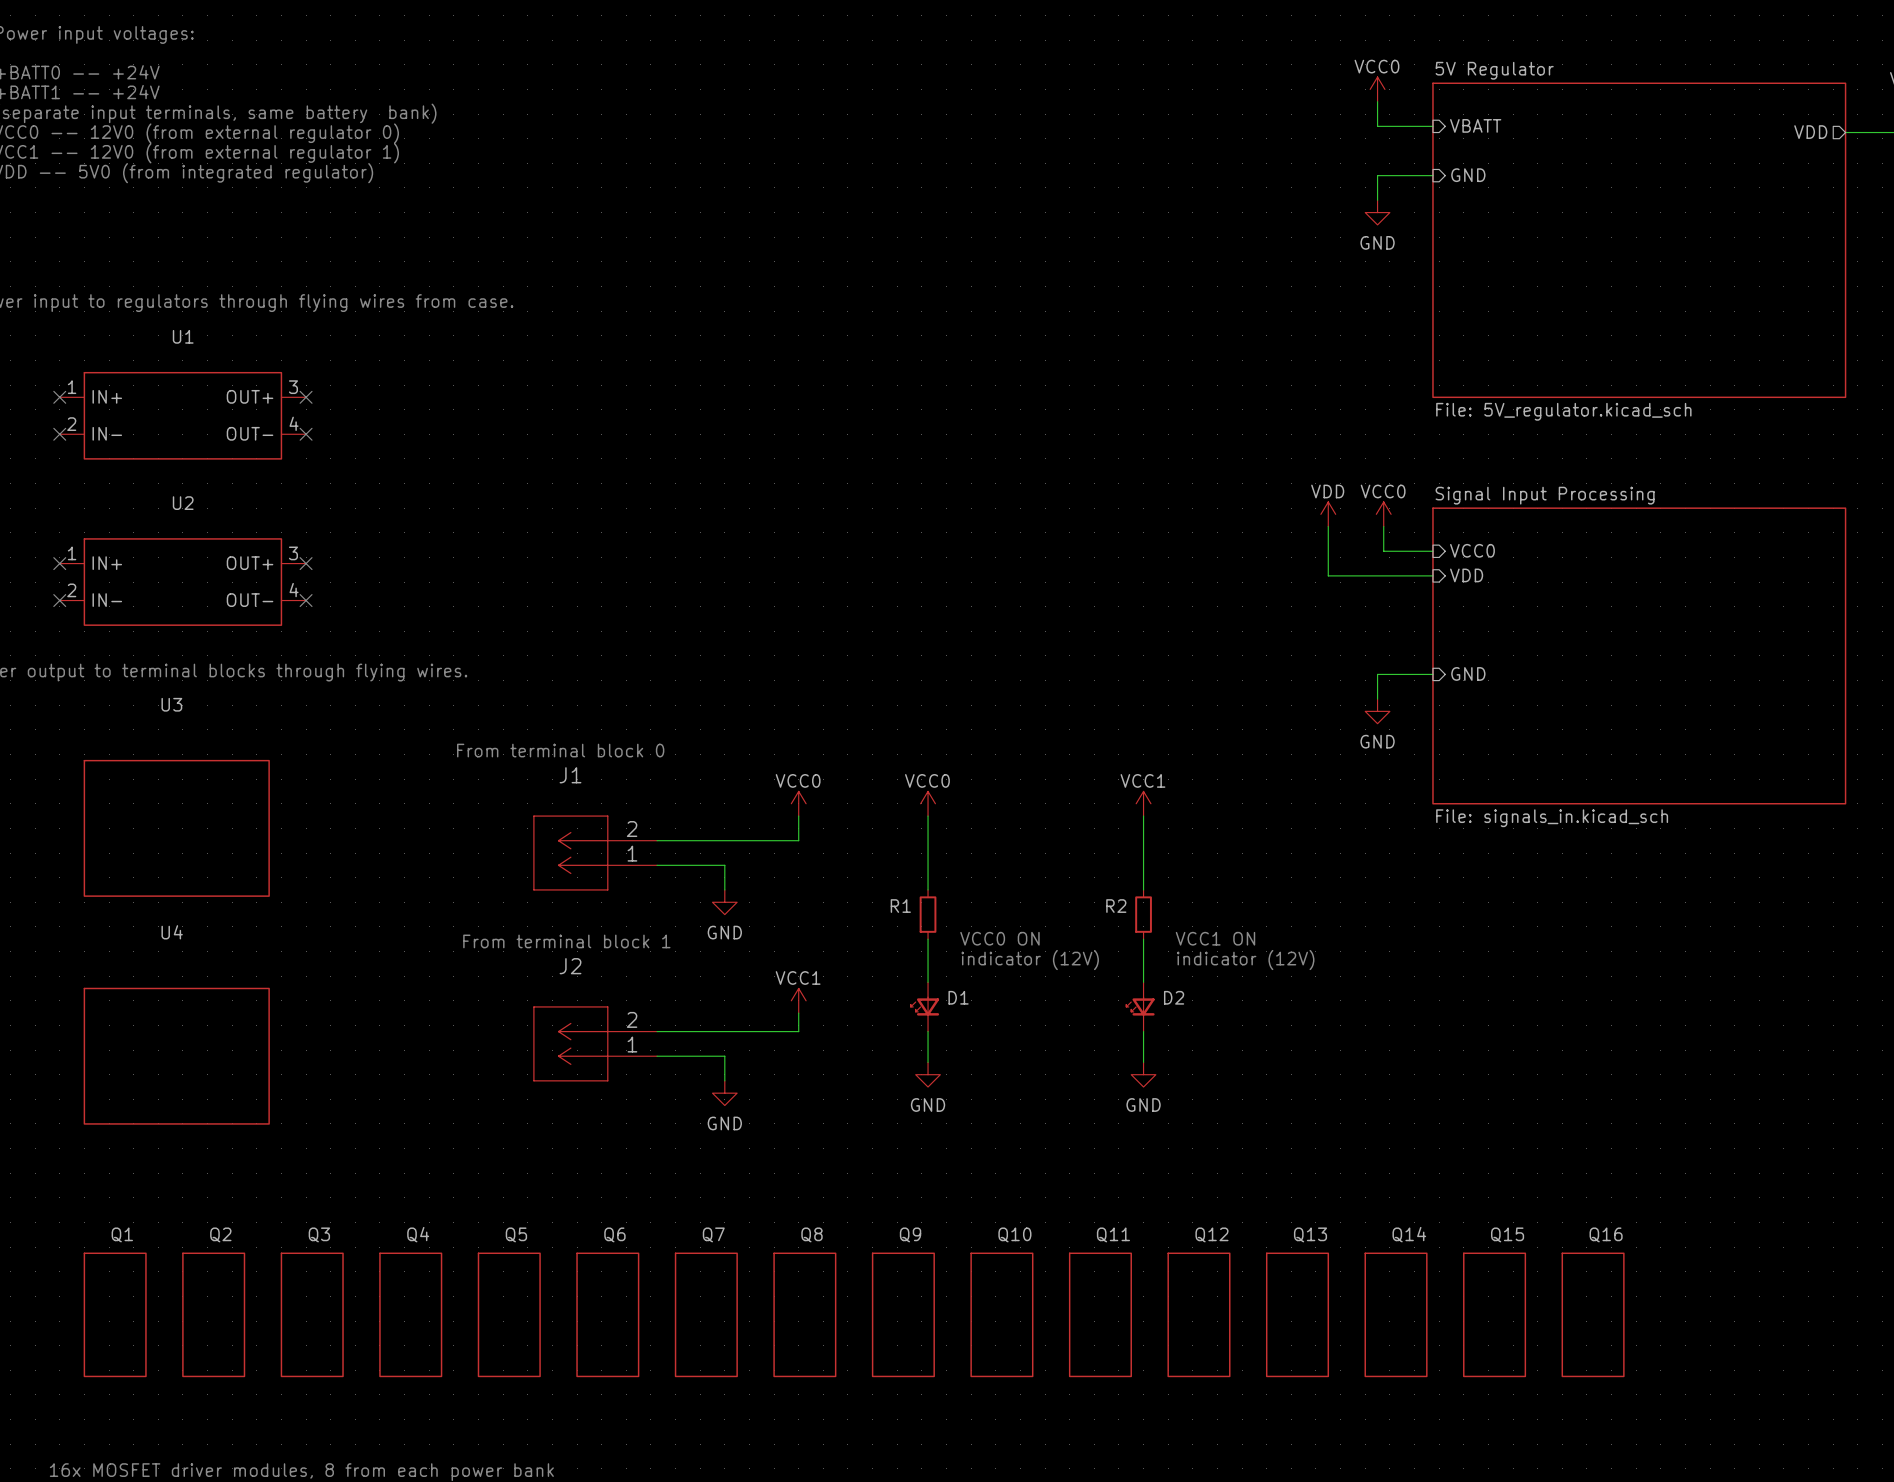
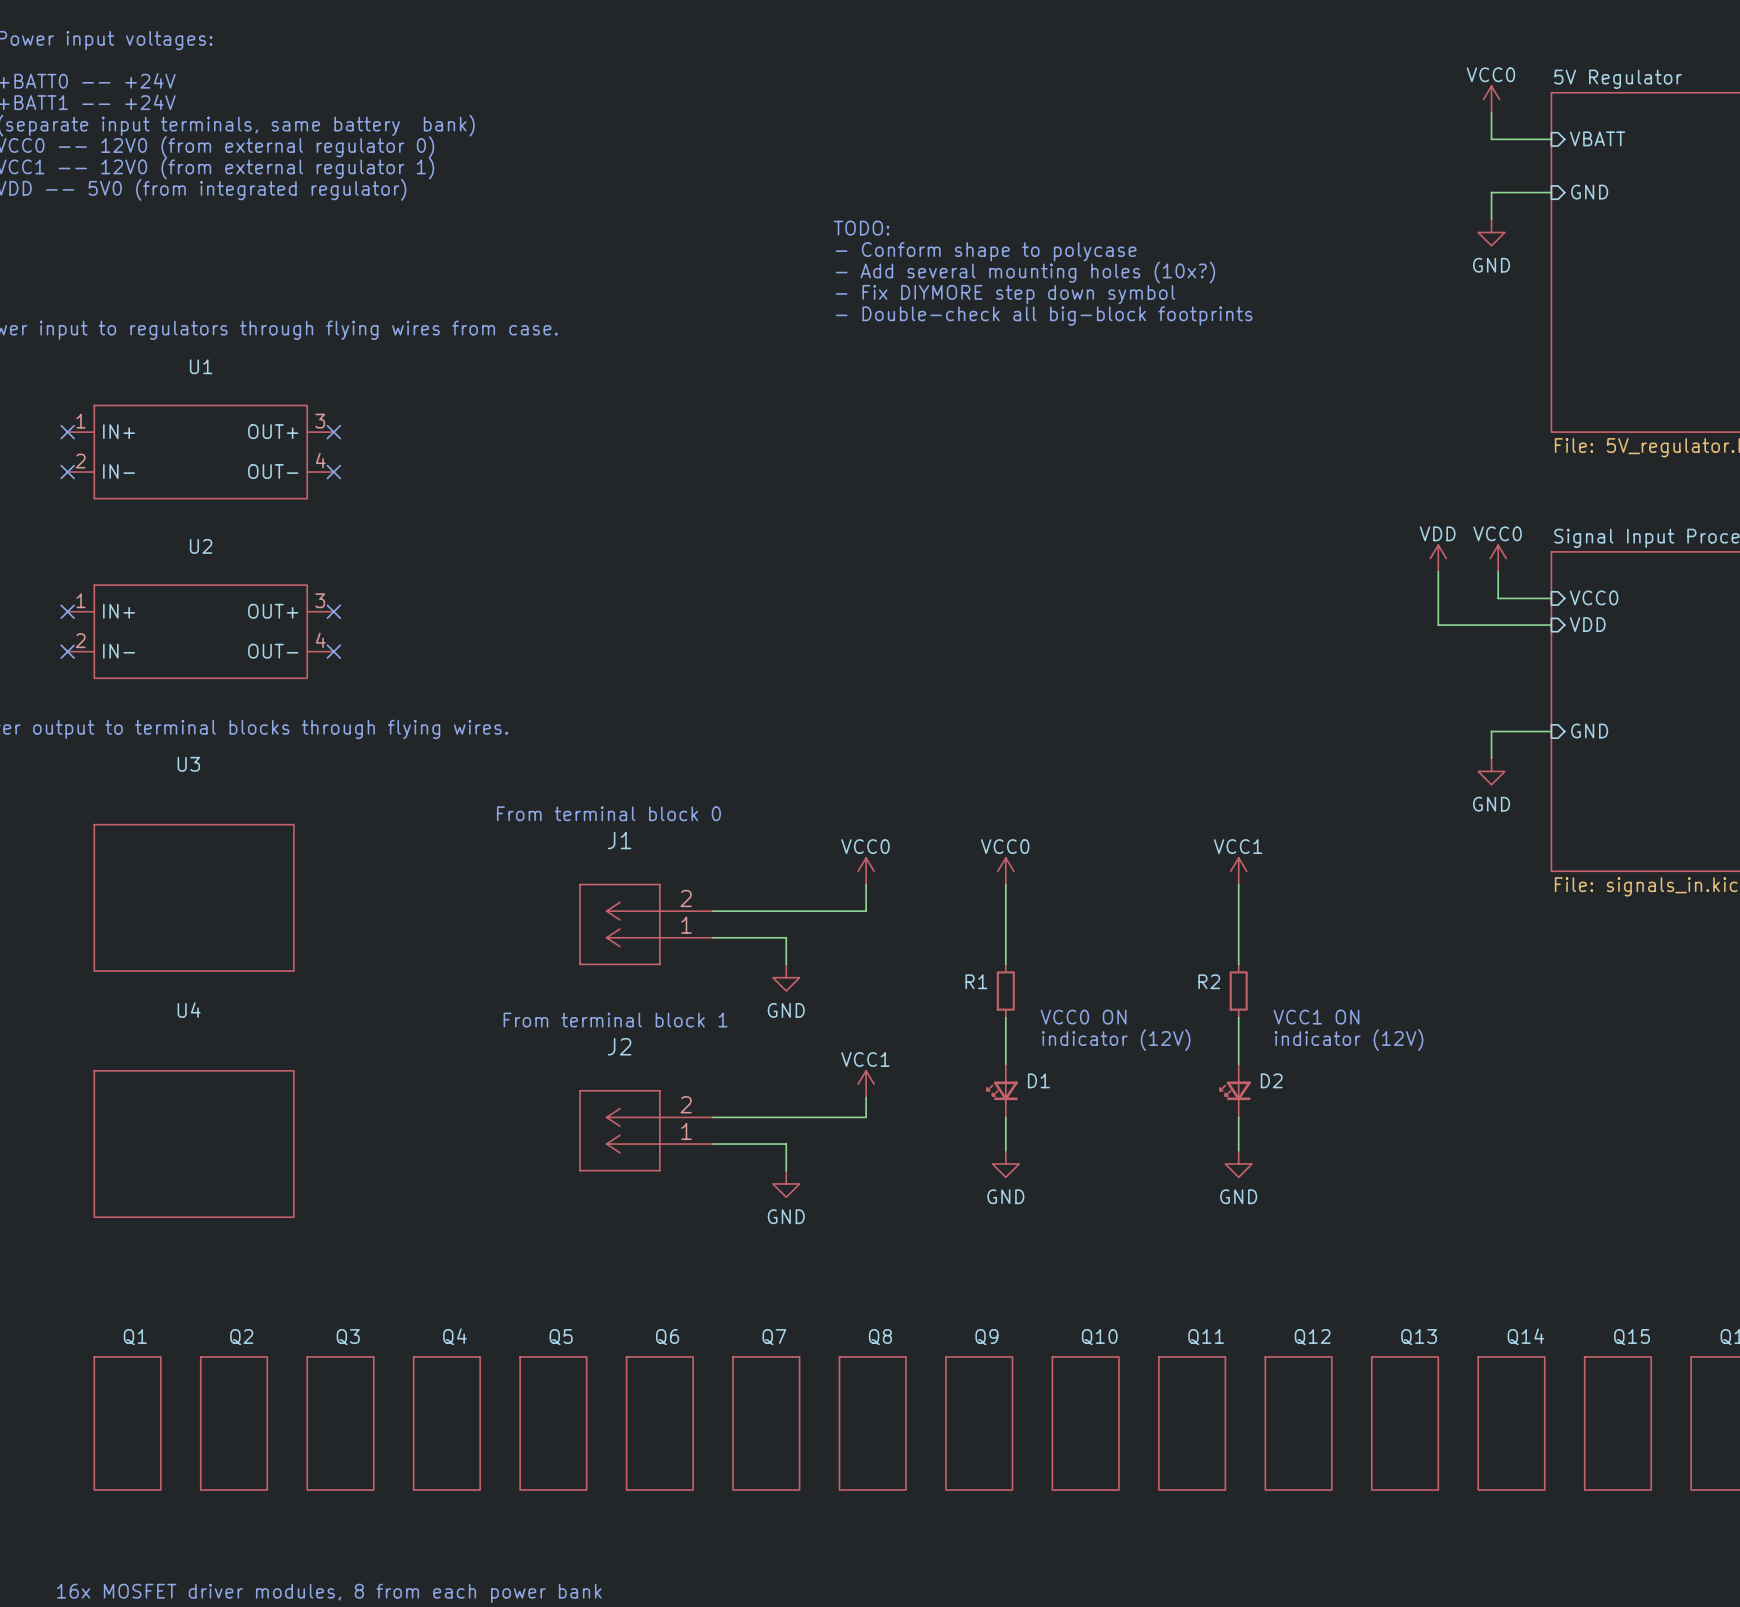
text: none -> TODO: (861, 228)
text: none -> - Conform shape to polycase (986, 251)
text: none -> - Add several mounting holes (10x?) (1025, 272)
text: none -> - Fix DIYMORE step down symbol (1005, 294)
text: none -> - Double-check all big-block footprints (1044, 316)

